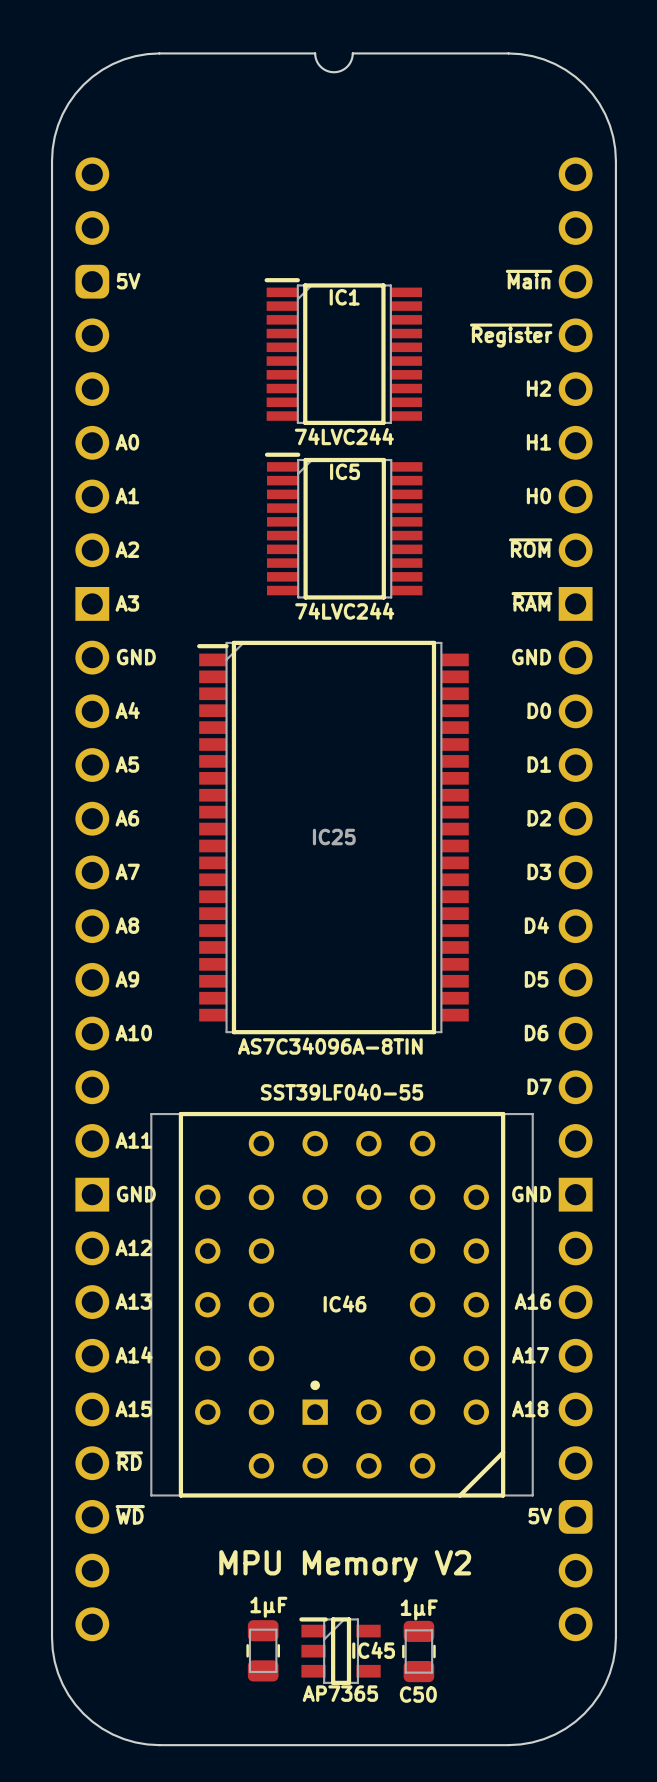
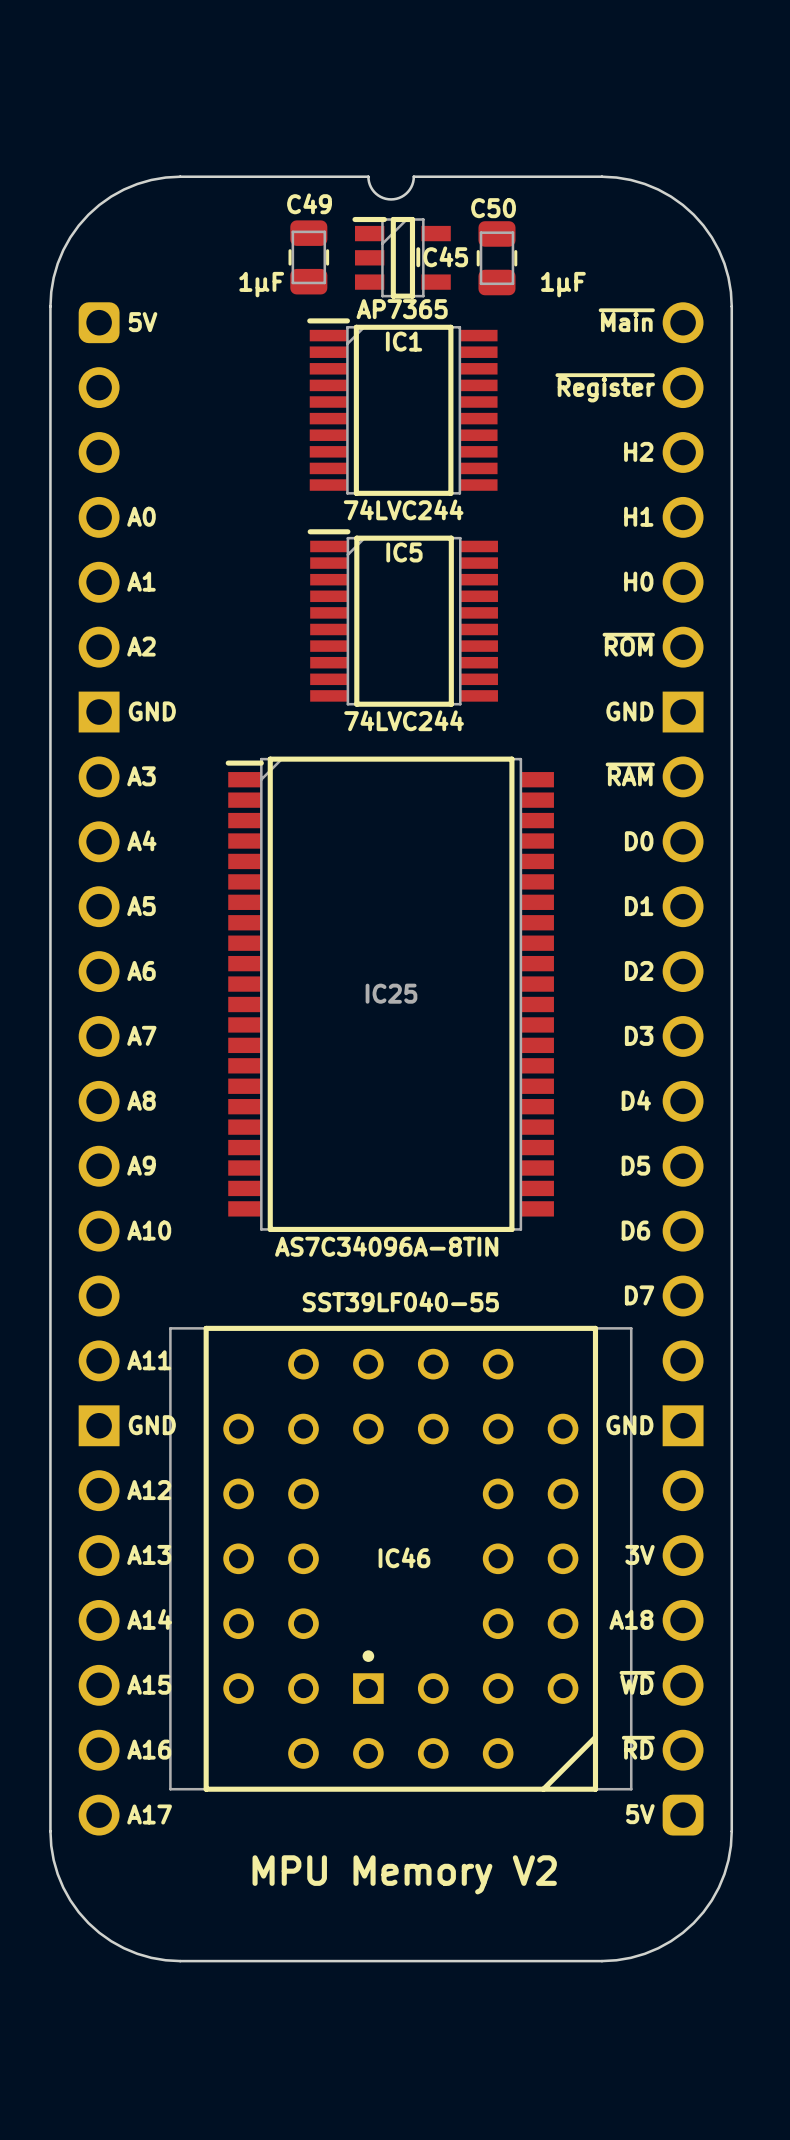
part footprint: [50, 52, 617, 1747] -> [49, 175, 734, 1963]
C49: none -> 1μF (308, 257)
text: ~{RAM} (531, 601) -> GND (629, 711)
text: A3 (127, 603) -> GND (152, 711)
text: GND (136, 657) -> A3 (141, 776)
text: GND (531, 657) -> ~{RAM} (630, 774)
text: A16 (532, 1301) -> 3V (639, 1554)
text: A17 (530, 1355) -> none
text: none -> ~{WD} (637, 1682)
text position: A18 (530, 1408) -> A18 (631, 1619)
text: ~{RD} (129, 1461) -> A16 (149, 1749)
text: none -> ~{RD} (638, 1747)
text: ~{WD} (130, 1514) -> A17 (149, 1814)
C50 value position: 1μF (419, 1609) -> 1μF (563, 284)
part: 1μF (263, 1650) -> none
IC45 position: (340, 1651) -> (401, 257)
C50 position: (418, 1651) -> (496, 258)
C50 name position: C50 (418, 1694) -> C50 (493, 208)

